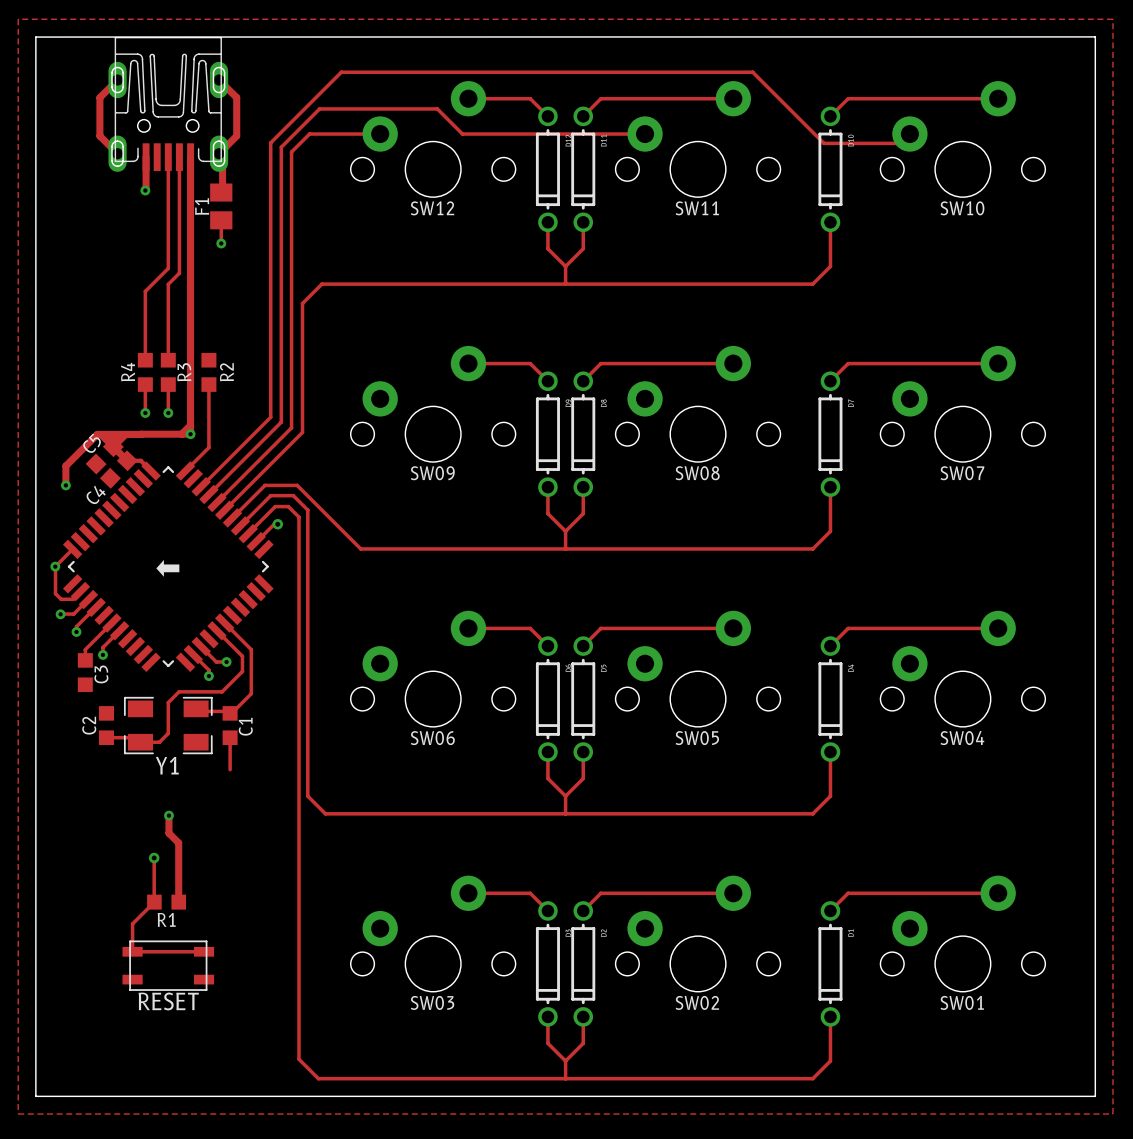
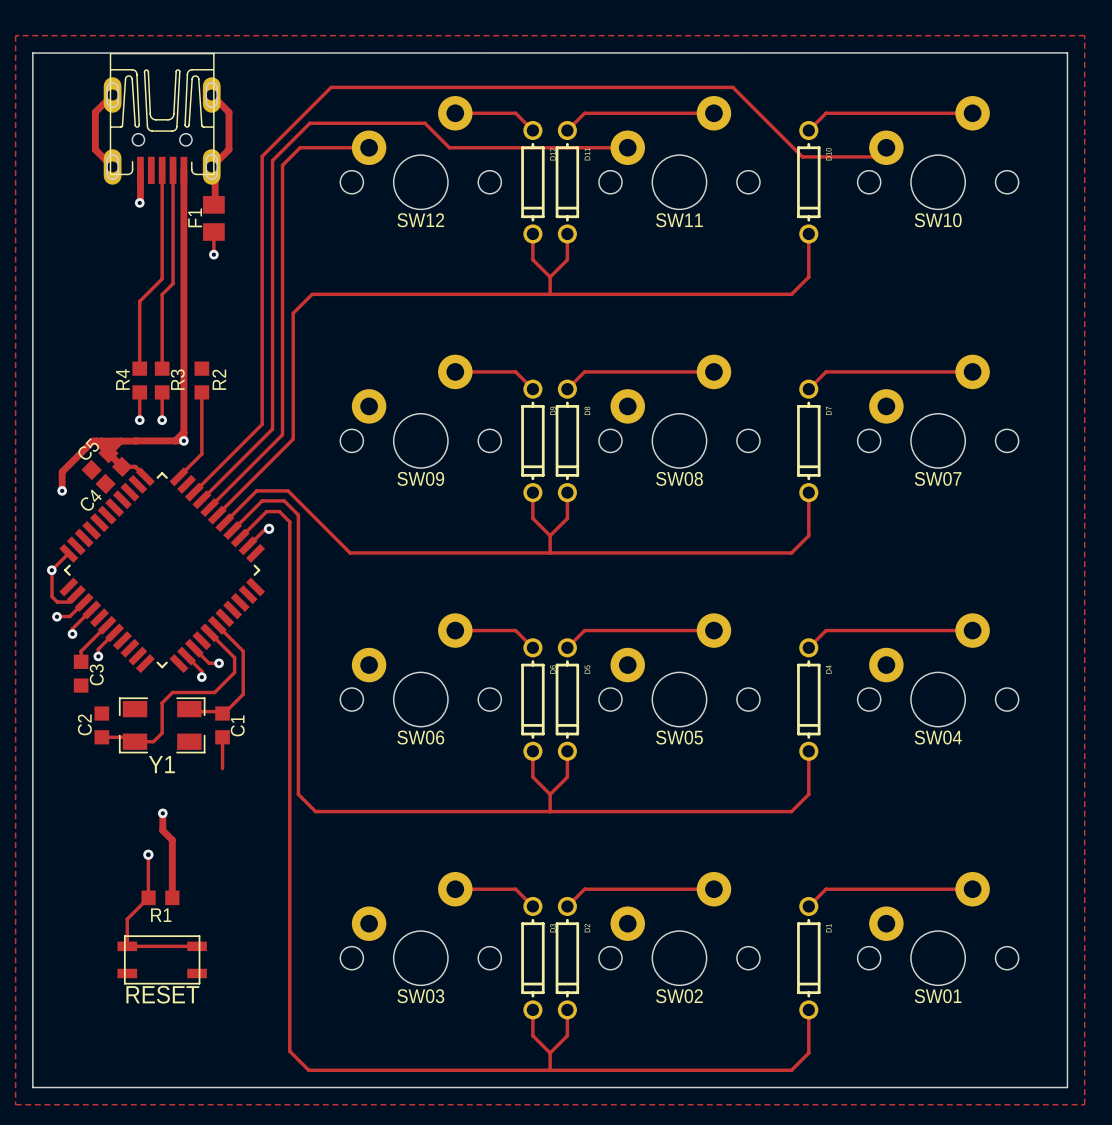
text: ⬅ (167, 568) -> none

